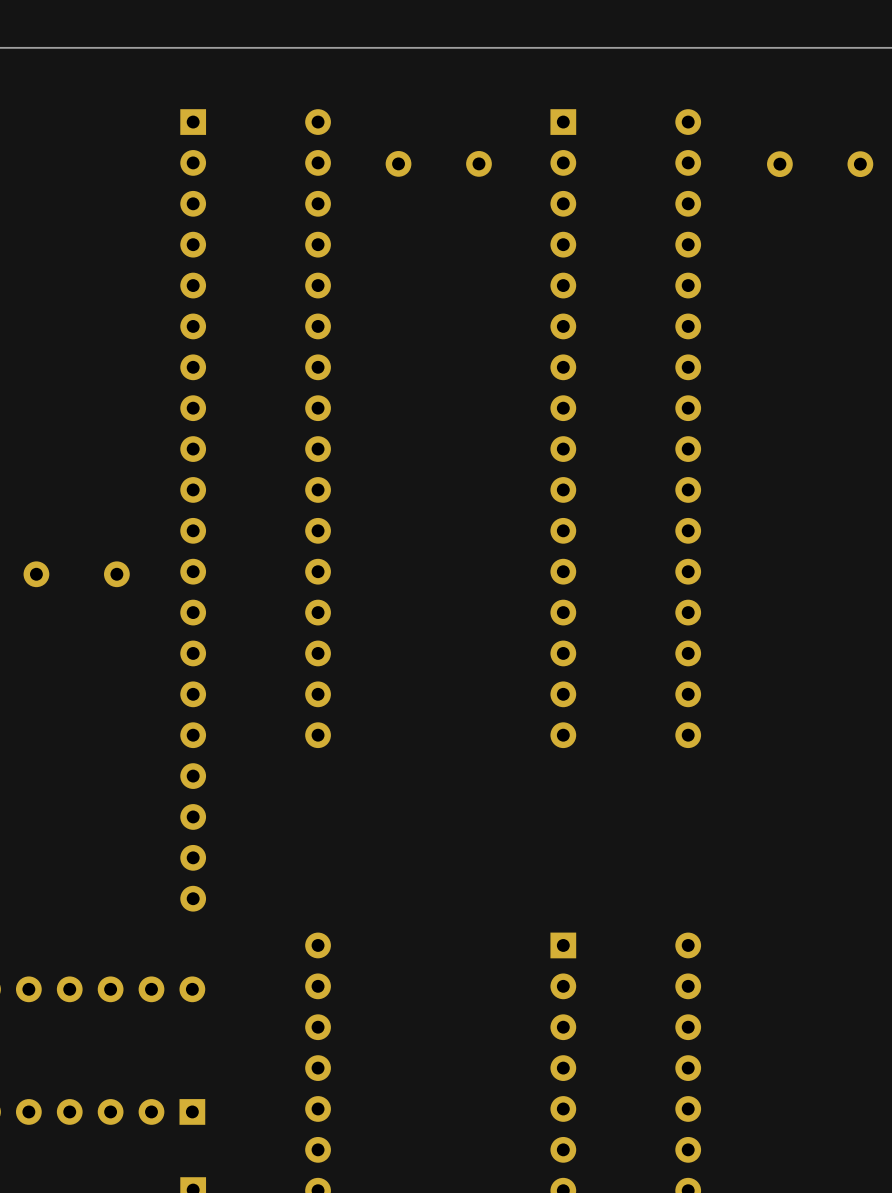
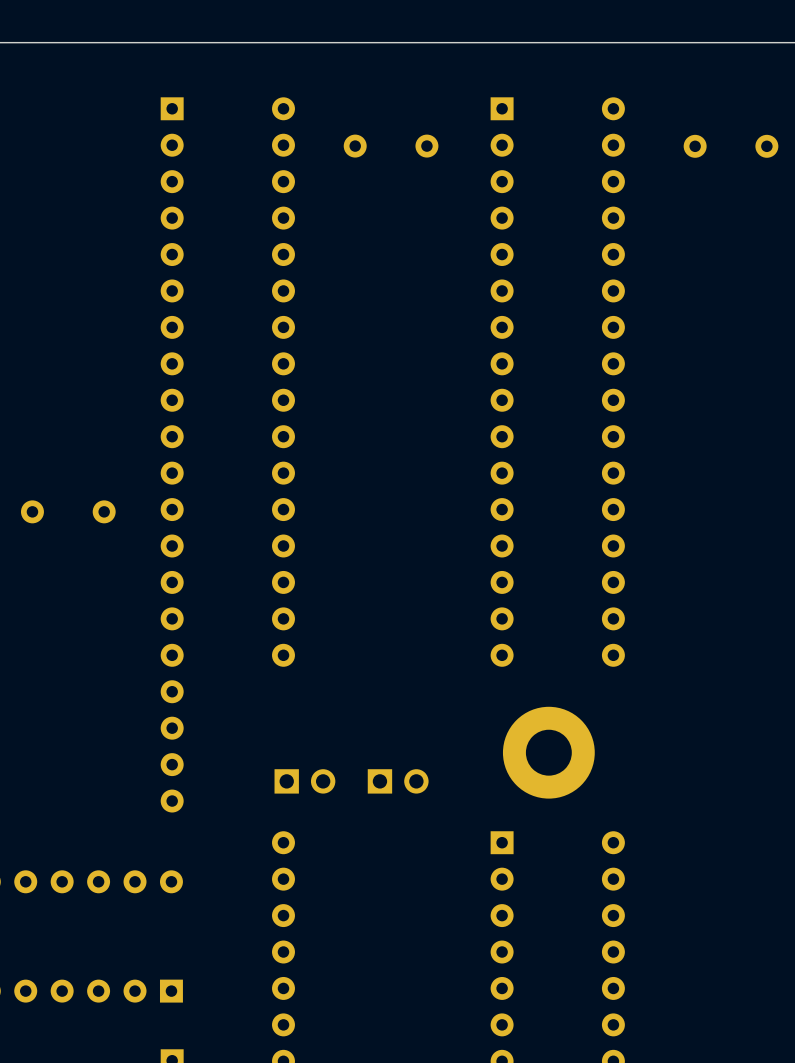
part: none -> (548, 752)
part: none -> (304, 781)
part: none -> (398, 781)

